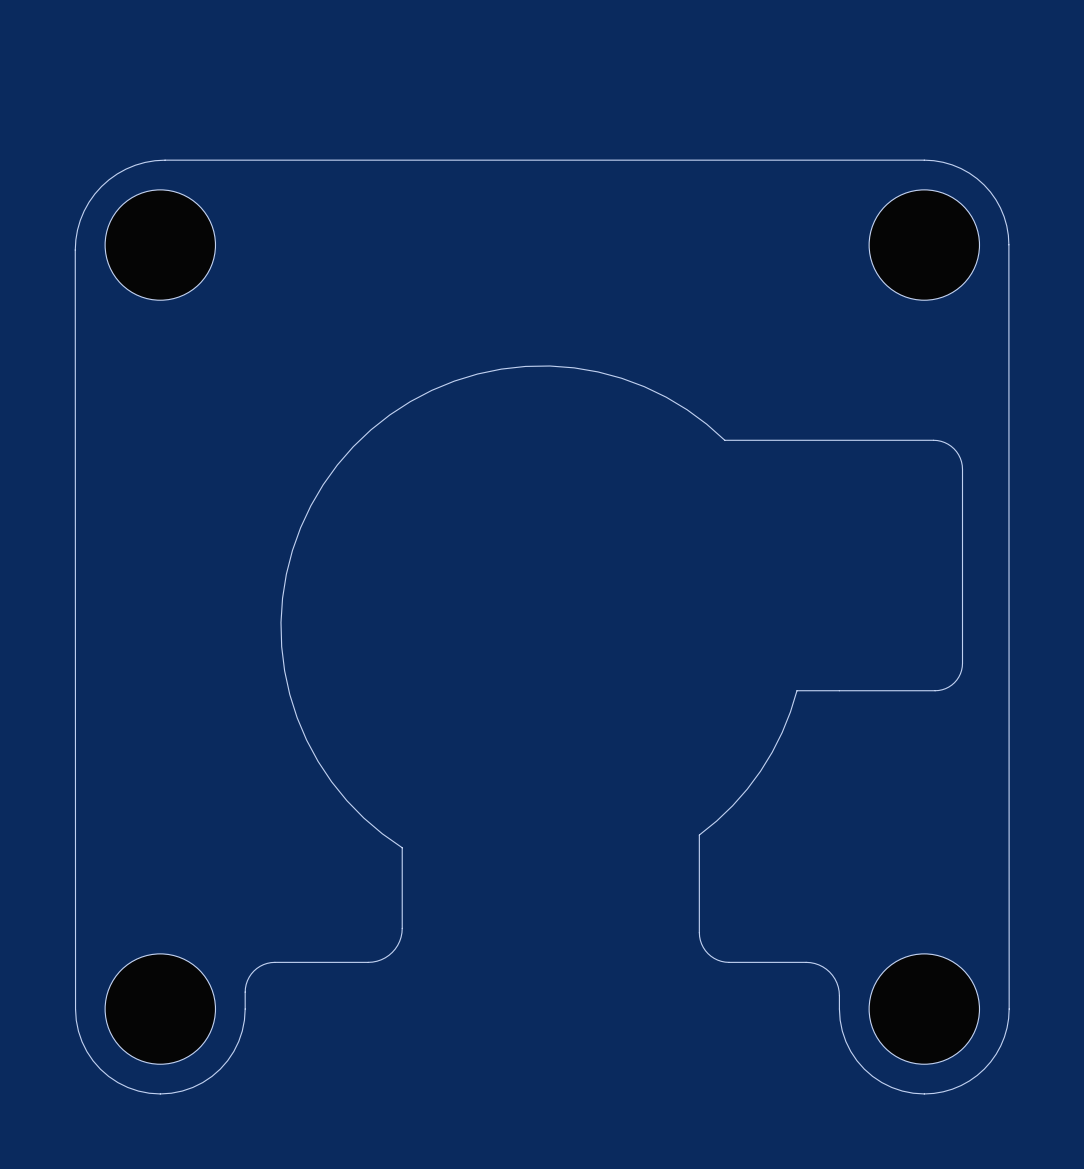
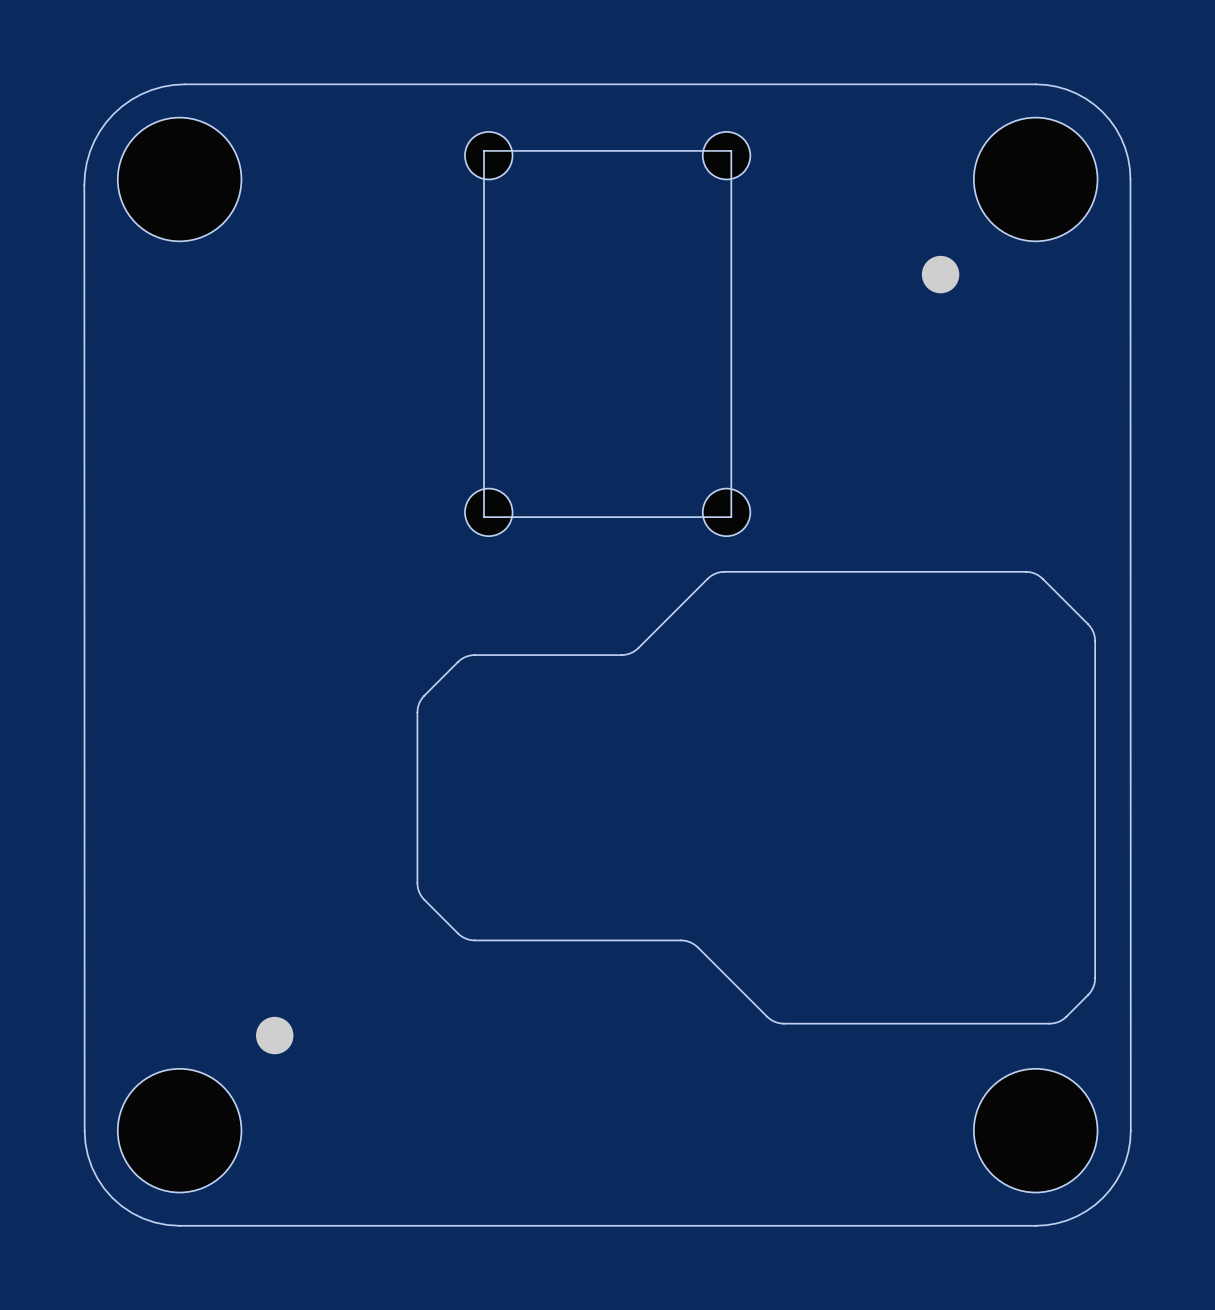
board edge: none -> (731, 150) (731, 517) (484, 517) (484, 150) (731, 150)
hole: none -> (488, 155)
hole: none -> (726, 155)
board edge: (1008, 244) (1004, 216) (990, 192) (969, 173) (952, 164) (933, 160) (165, 160) (135, 165) (109, 179) (94, 194) (84, 211) (77, 230) (75, 250) (75, 1009) -> (1130, 274) (1129, 168) (1121, 138) (1109, 120) (1086, 98) (1067, 89) (1046, 84) (184, 84) (151, 89) (122, 106) (106, 122) (94, 141) (86, 162) (84, 185) (84, 1130)
part position: (160, 245) -> (179, 179)
part: none -> (940, 274)
part position: (924, 245) -> (1035, 179)
hole: none -> (488, 512)
hole: none -> (726, 512)
board edge: none -> (1025, 571) (721, 572) (707, 578) (638, 648) (627, 654) (474, 655) (462, 658) (424, 695) (417, 709) (417, 883) (420, 894) (458, 933) (471, 940) (681, 940) (690, 942) (697, 947) (767, 1016) (780, 1023) (1049, 1023) (1061, 1020) (1090, 992) (1094, 981) (1094, 638) (1088, 624) (1042, 578) (1034, 573) (1025, 571)
part: none -> (274, 1035)
board edge: (924, 1093) (891, 1087) (872, 1076) (856, 1060) (842, 1031) (836, 982) (829, 972) (822, 966) (806, 962) (725, 962) (714, 958) (705, 950) (700, 940) (699, 932) (699, 835) (732, 805) (760, 771) (782, 732) (796, 690) (938, 690) (948, 687) (956, 680) (962, 663) (962, 469) (958, 454) (948, 444) (933, 440) (724, 440) (687, 409) (644, 386) (598, 371) (549, 366) (525, 366) (477, 374) (431, 390) (410, 401) (389, 414) (353, 446) (337, 464) (310, 505) (292, 550) (282, 598) (281, 646) (284, 670) (297, 717) (306, 740) (331, 781) (363, 818) (402, 847) (401, 937) (392, 952) (377, 961) (274, 962) (260, 966) (251, 973) (247, 980) (242, 1031) (227, 1060) (211, 1076) (192, 1087) (160, 1093) -> (1035, 1225) (179, 1225)

